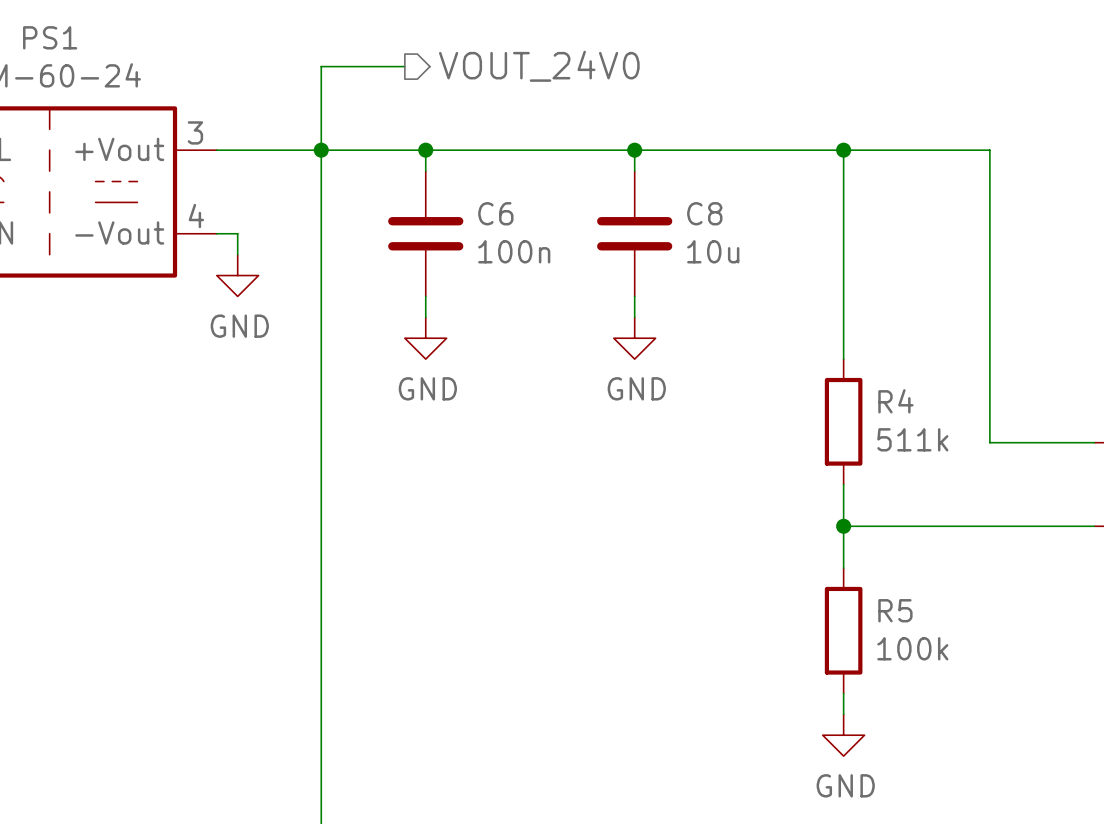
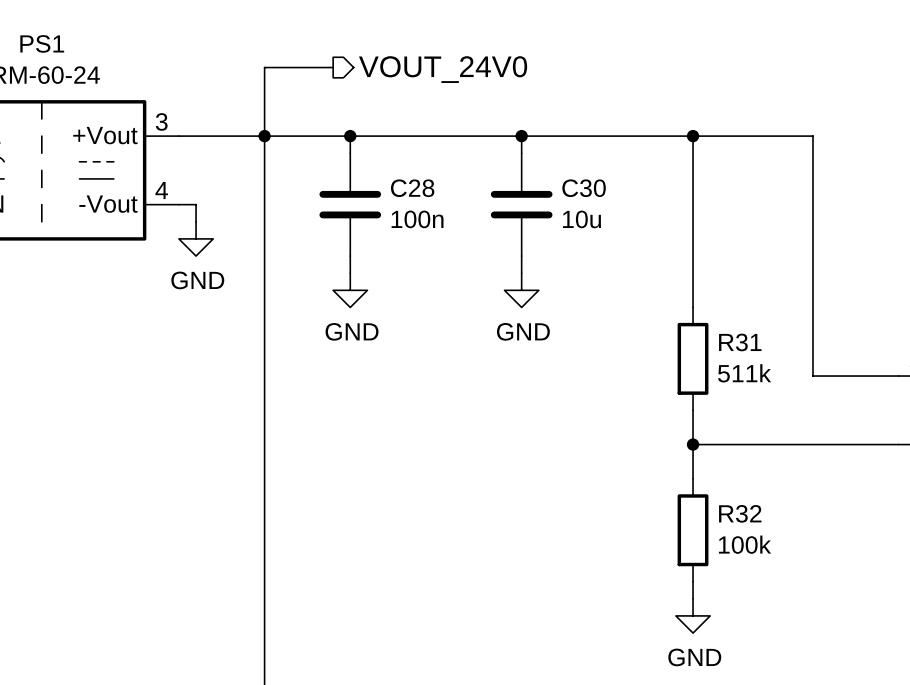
C6 name: C6 (495, 213) -> C28 (412, 188)
C8 name: C8 (704, 213) -> C30 (584, 188)
R4 name: R4 (895, 401) -> R31 (740, 342)
R5 name: R5 (895, 610) -> R32 (740, 513)

